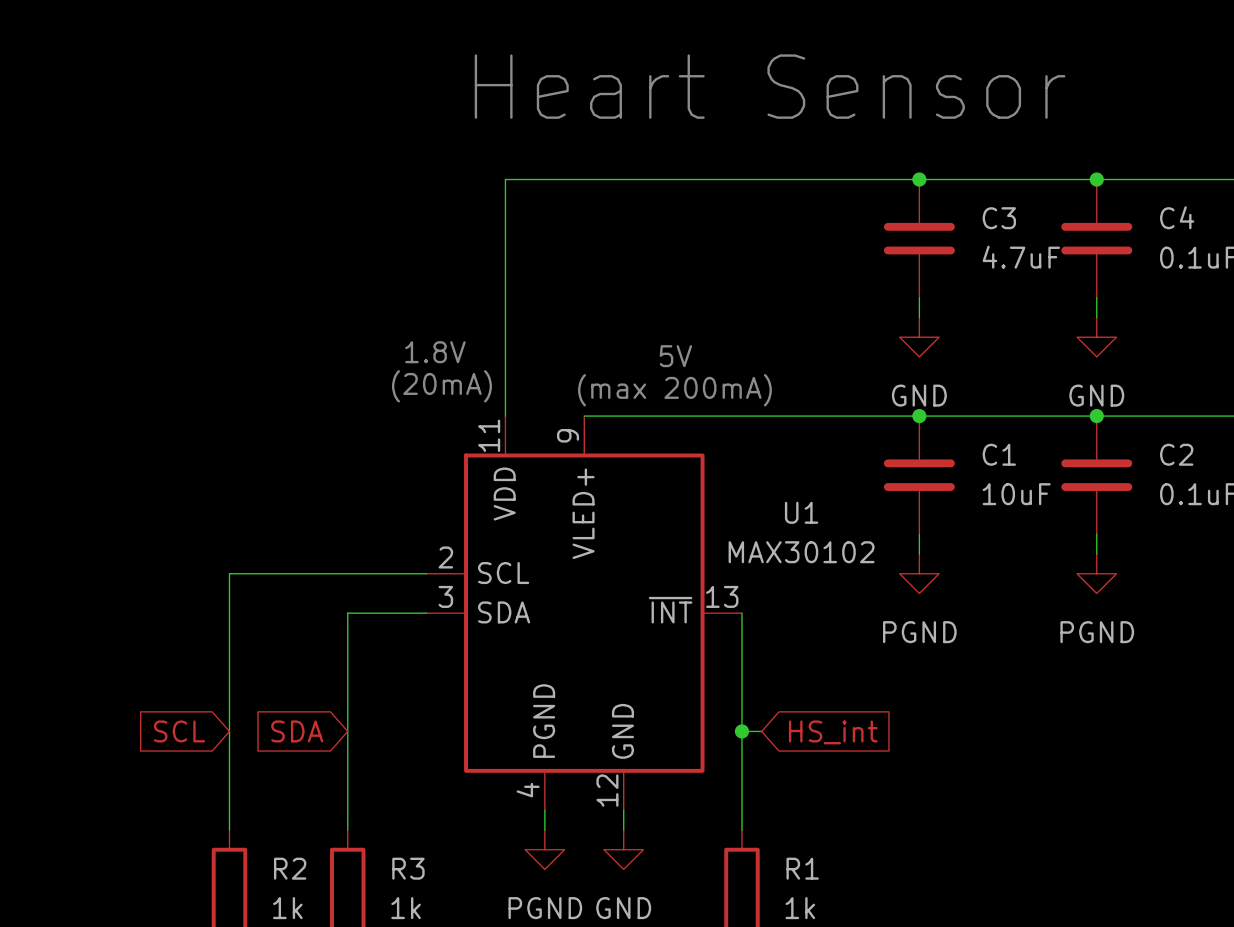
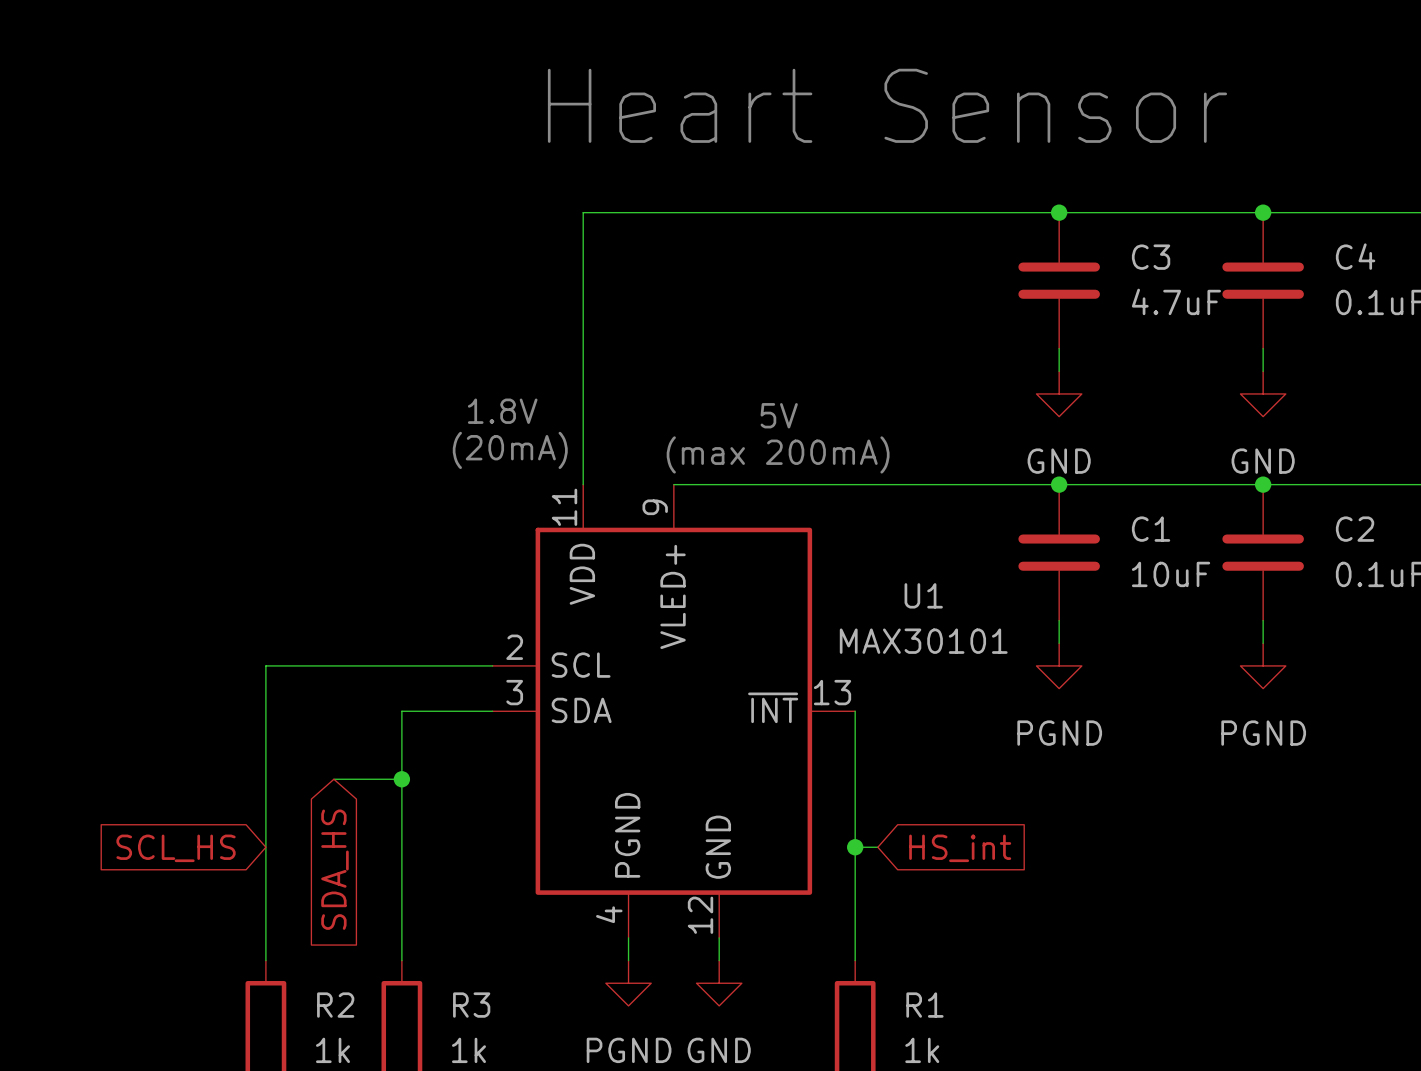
U1 value: MAX30102 (801, 552) -> MAX30101 (923, 641)
wire: none -> (333, 779) (401, 779)
junction: none -> (401, 779)
global label: SCL (179, 731) -> SCL_HS (176, 848)
global label: SDA (297, 731) -> SDA_HS (334, 869)

